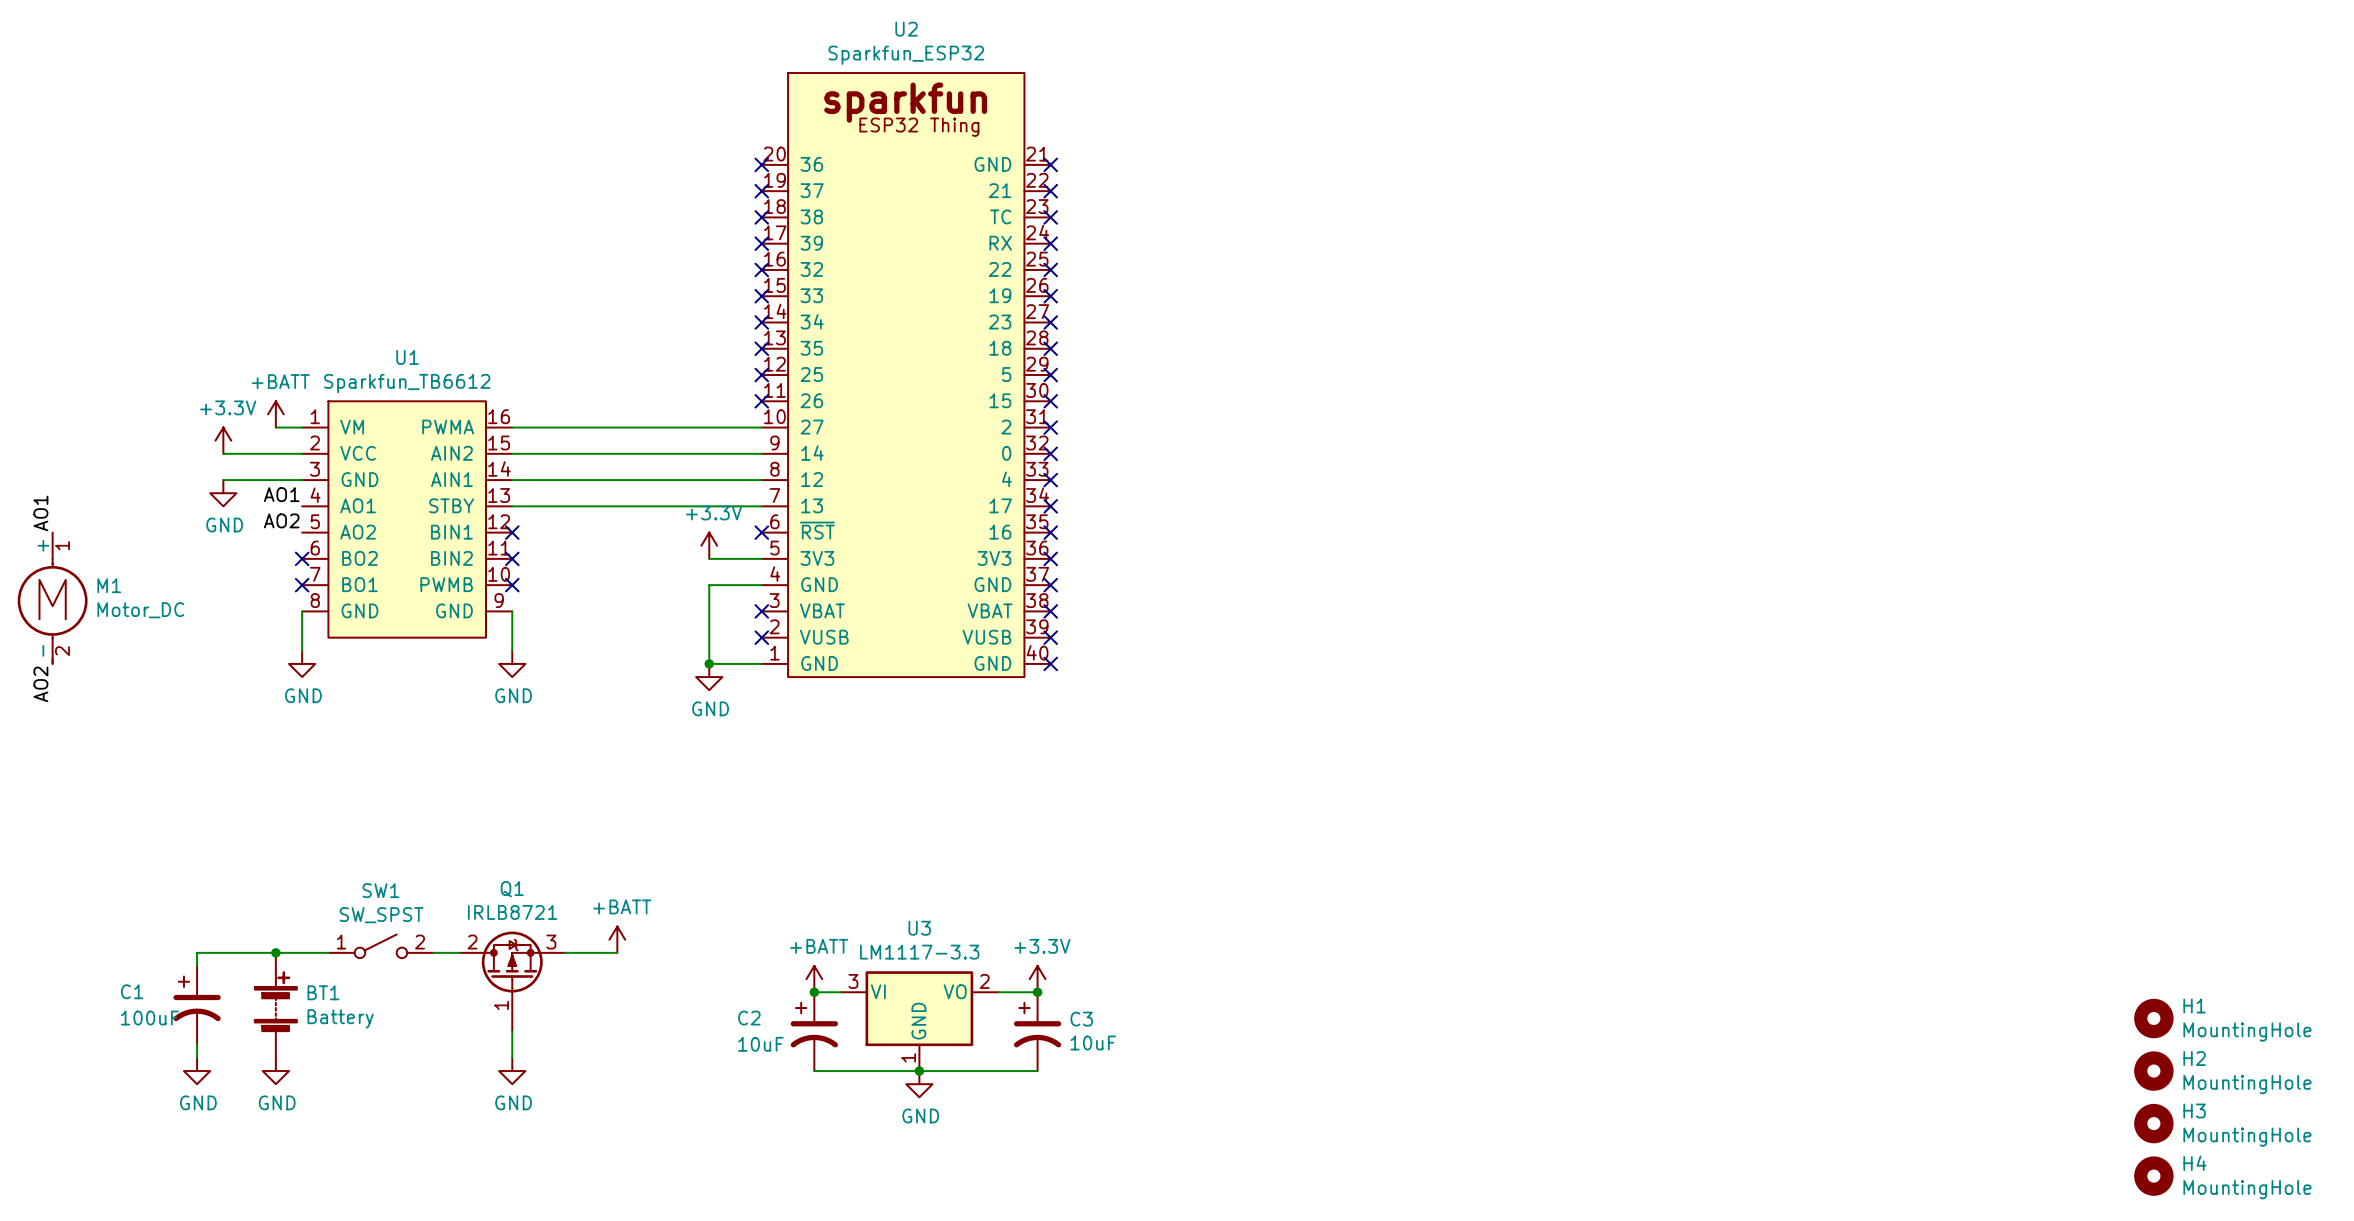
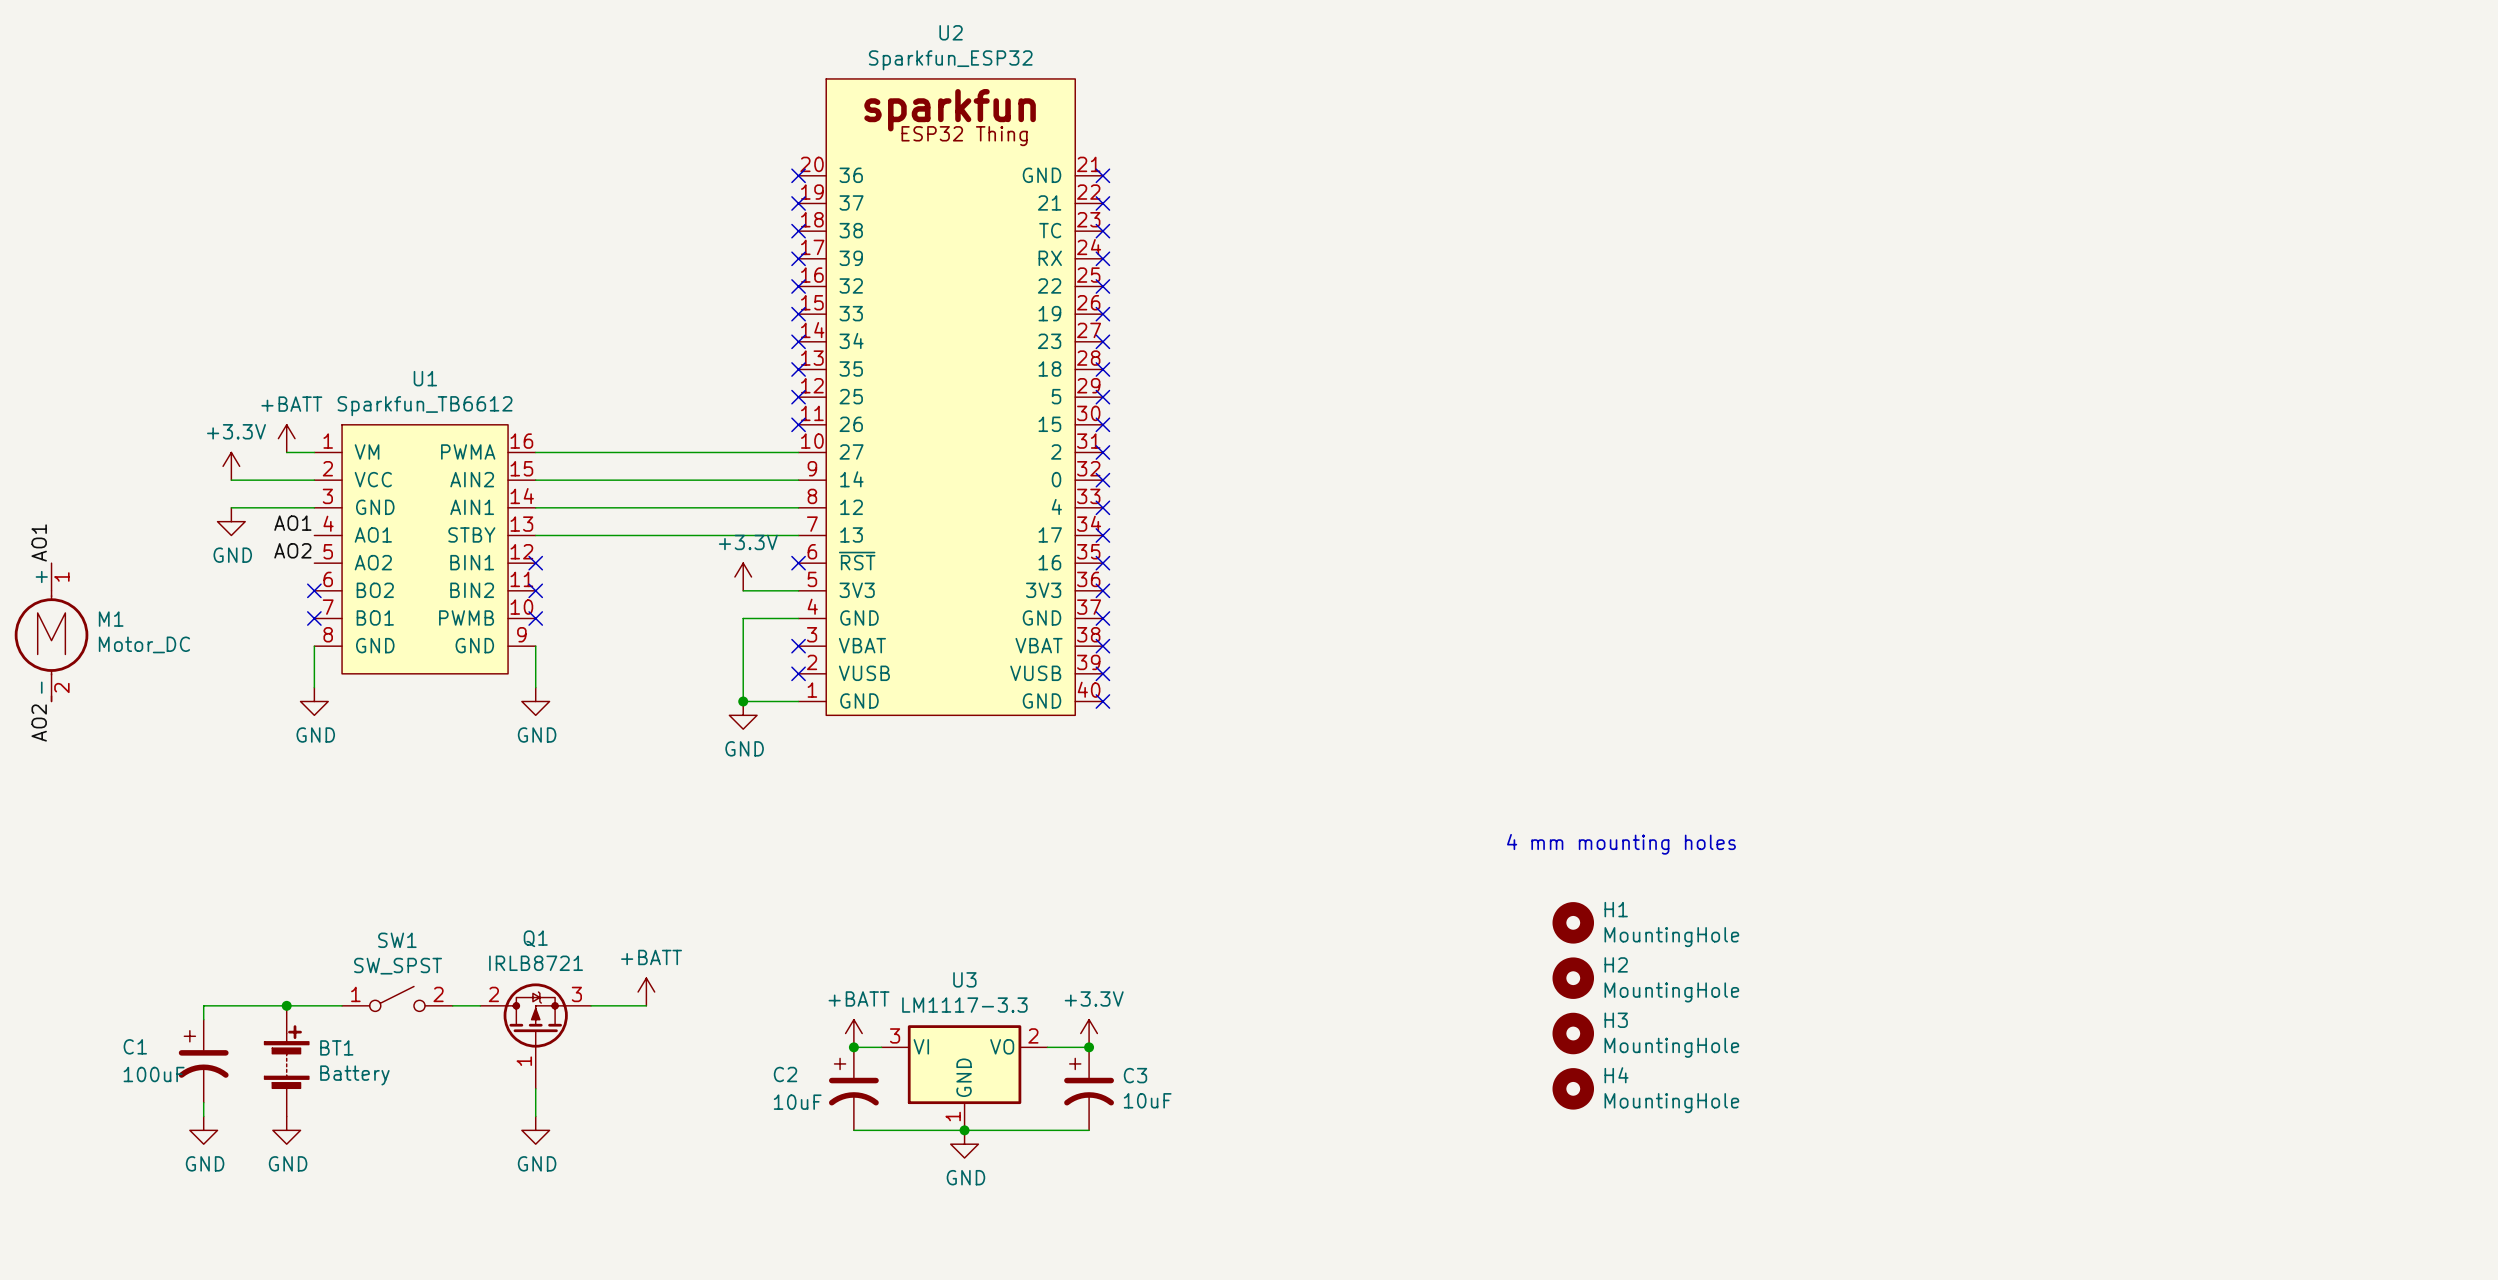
text: none -> 4 mm mounting holes (1621, 844)
H1 position: (2153, 1018) -> (1573, 922)
H2 position: (2153, 1071) -> (1573, 978)
H3 position: (2153, 1123) -> (1573, 1033)
H4 position: (2153, 1176) -> (1573, 1088)

